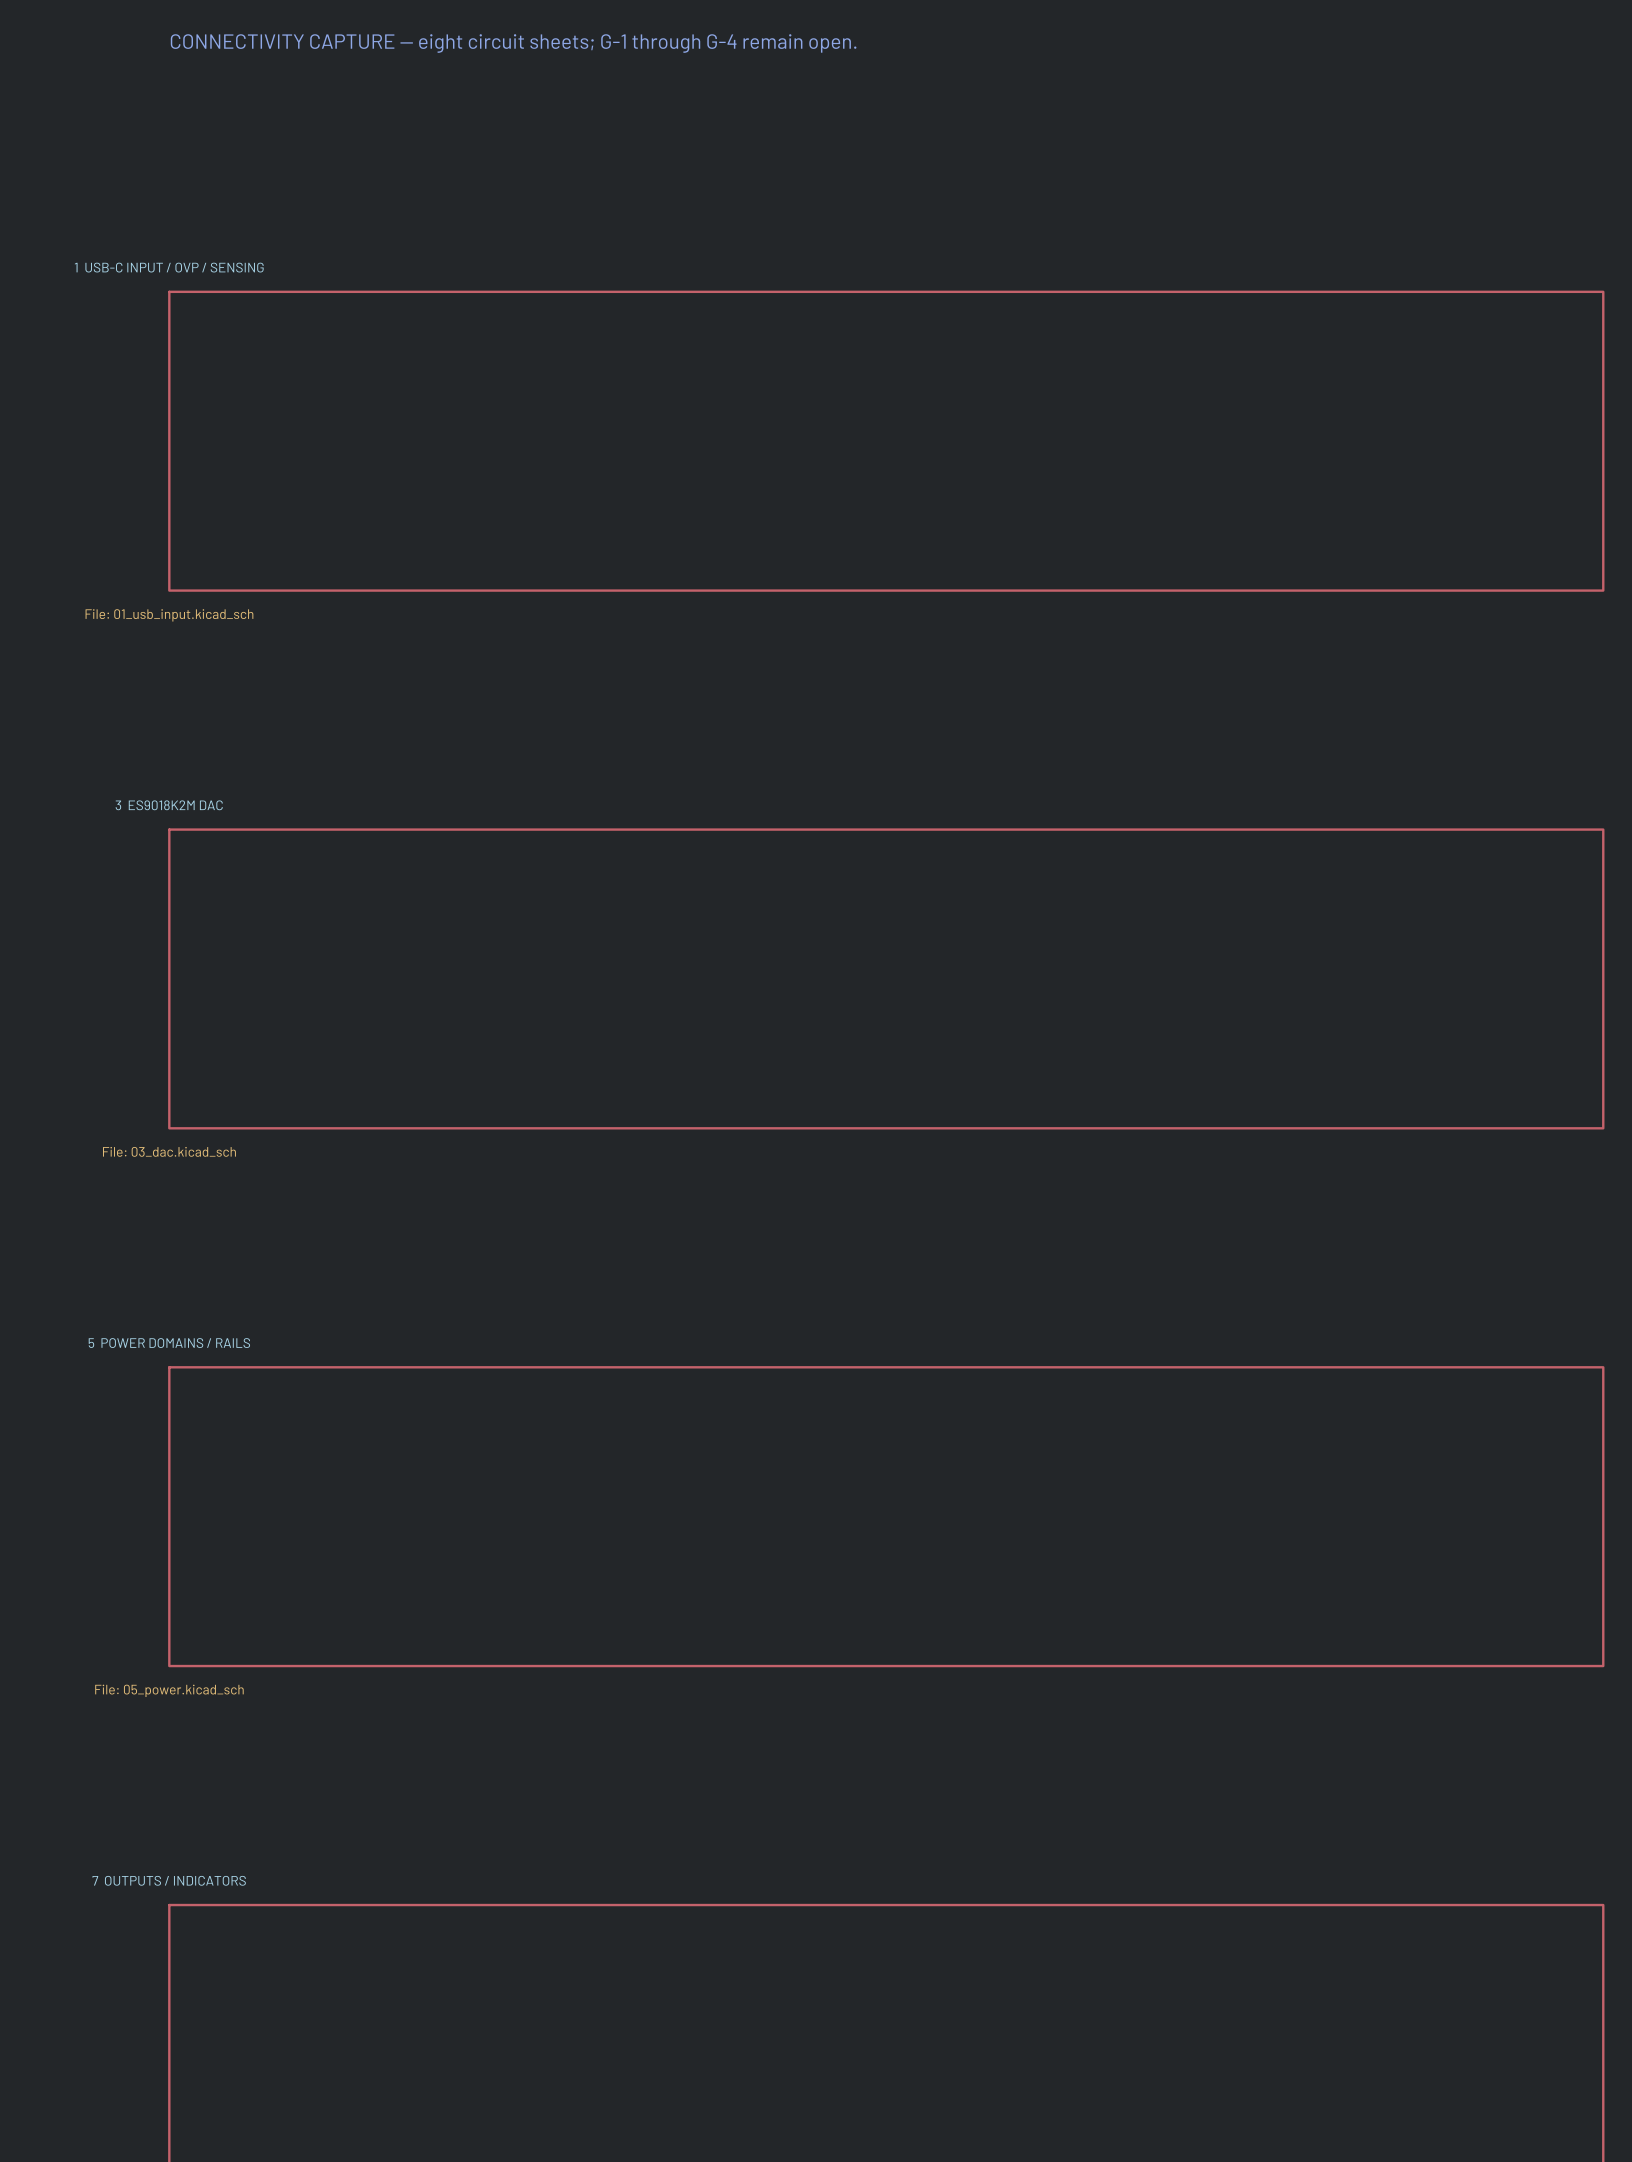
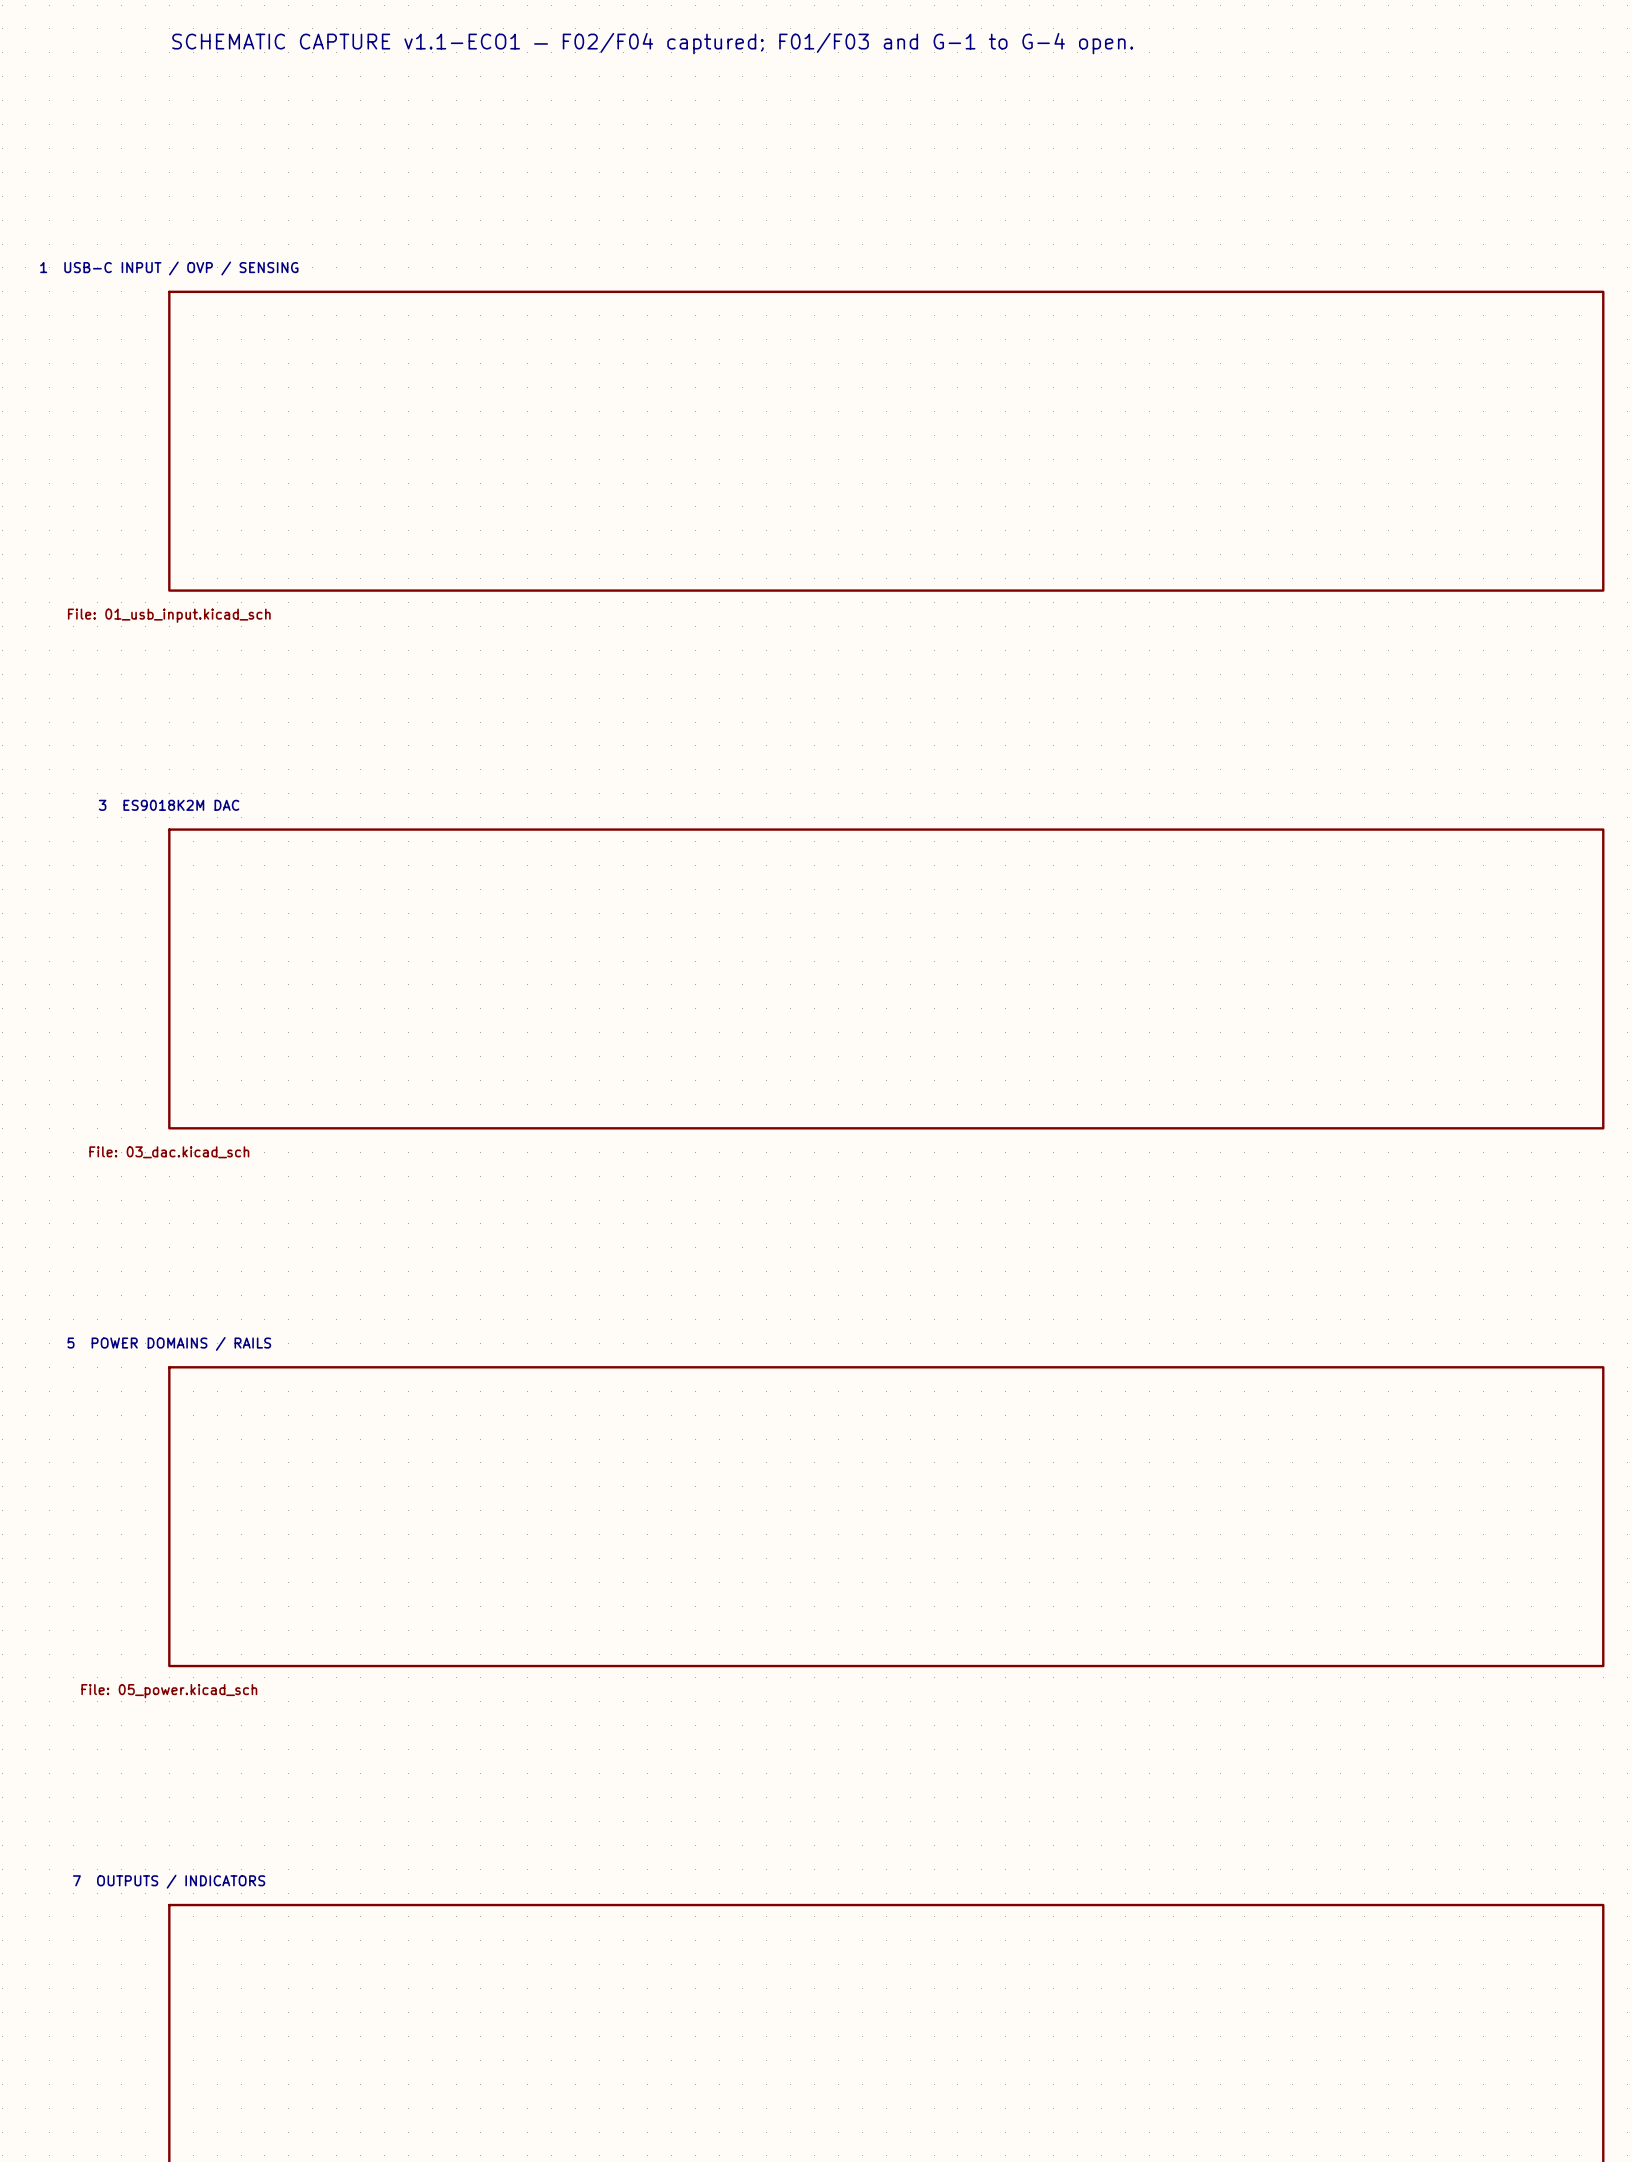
text: CONNECTIVITY CAPTURE — eight circuit sheets; G-1 through G-4 remain open. (513, 43) -> SCHEMATIC CAPTURE v1.1-ECO1 — F02/F04 captured; F01/F03 and G-1 to G-4 open. (652, 43)

